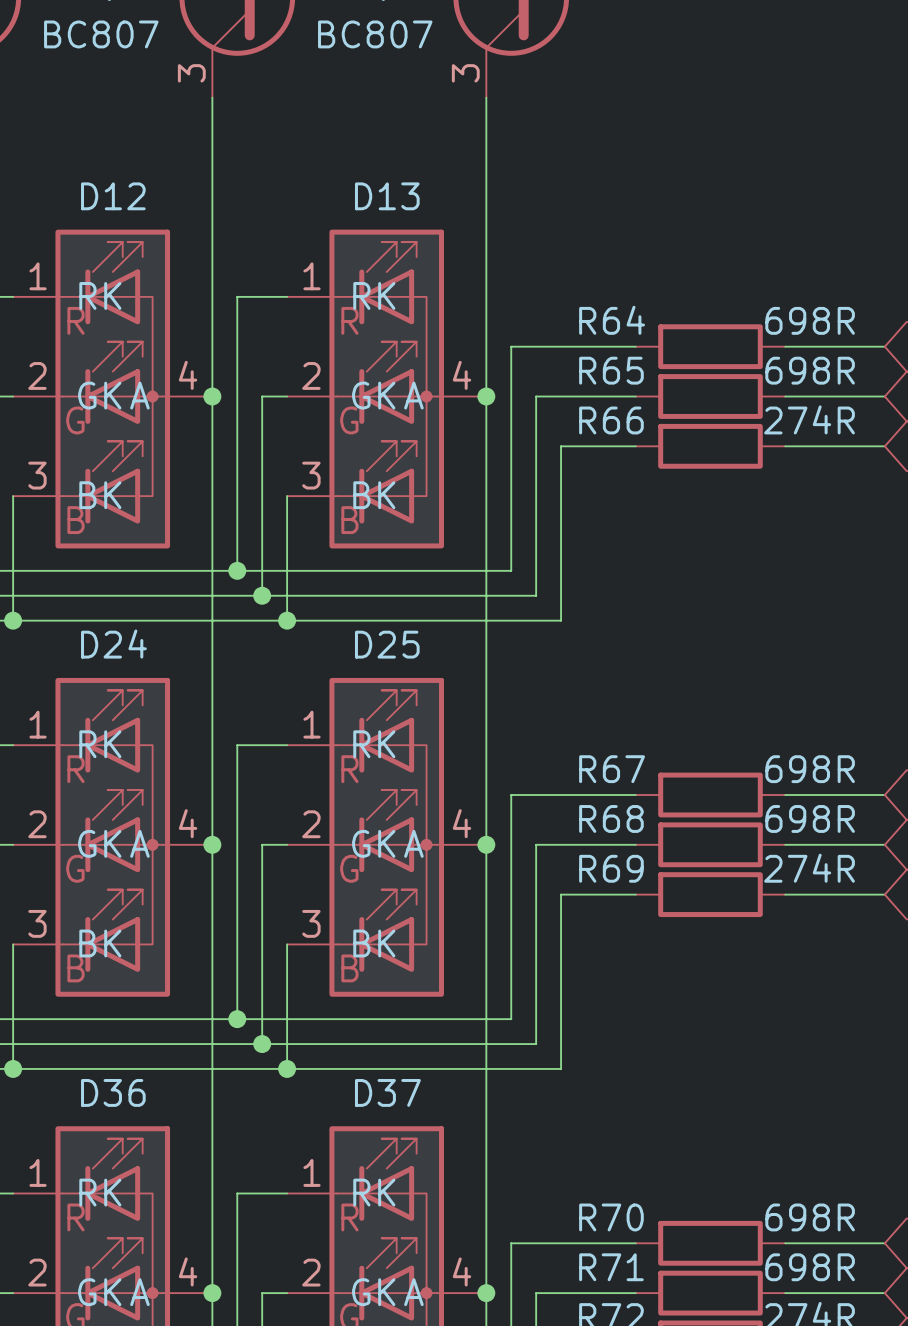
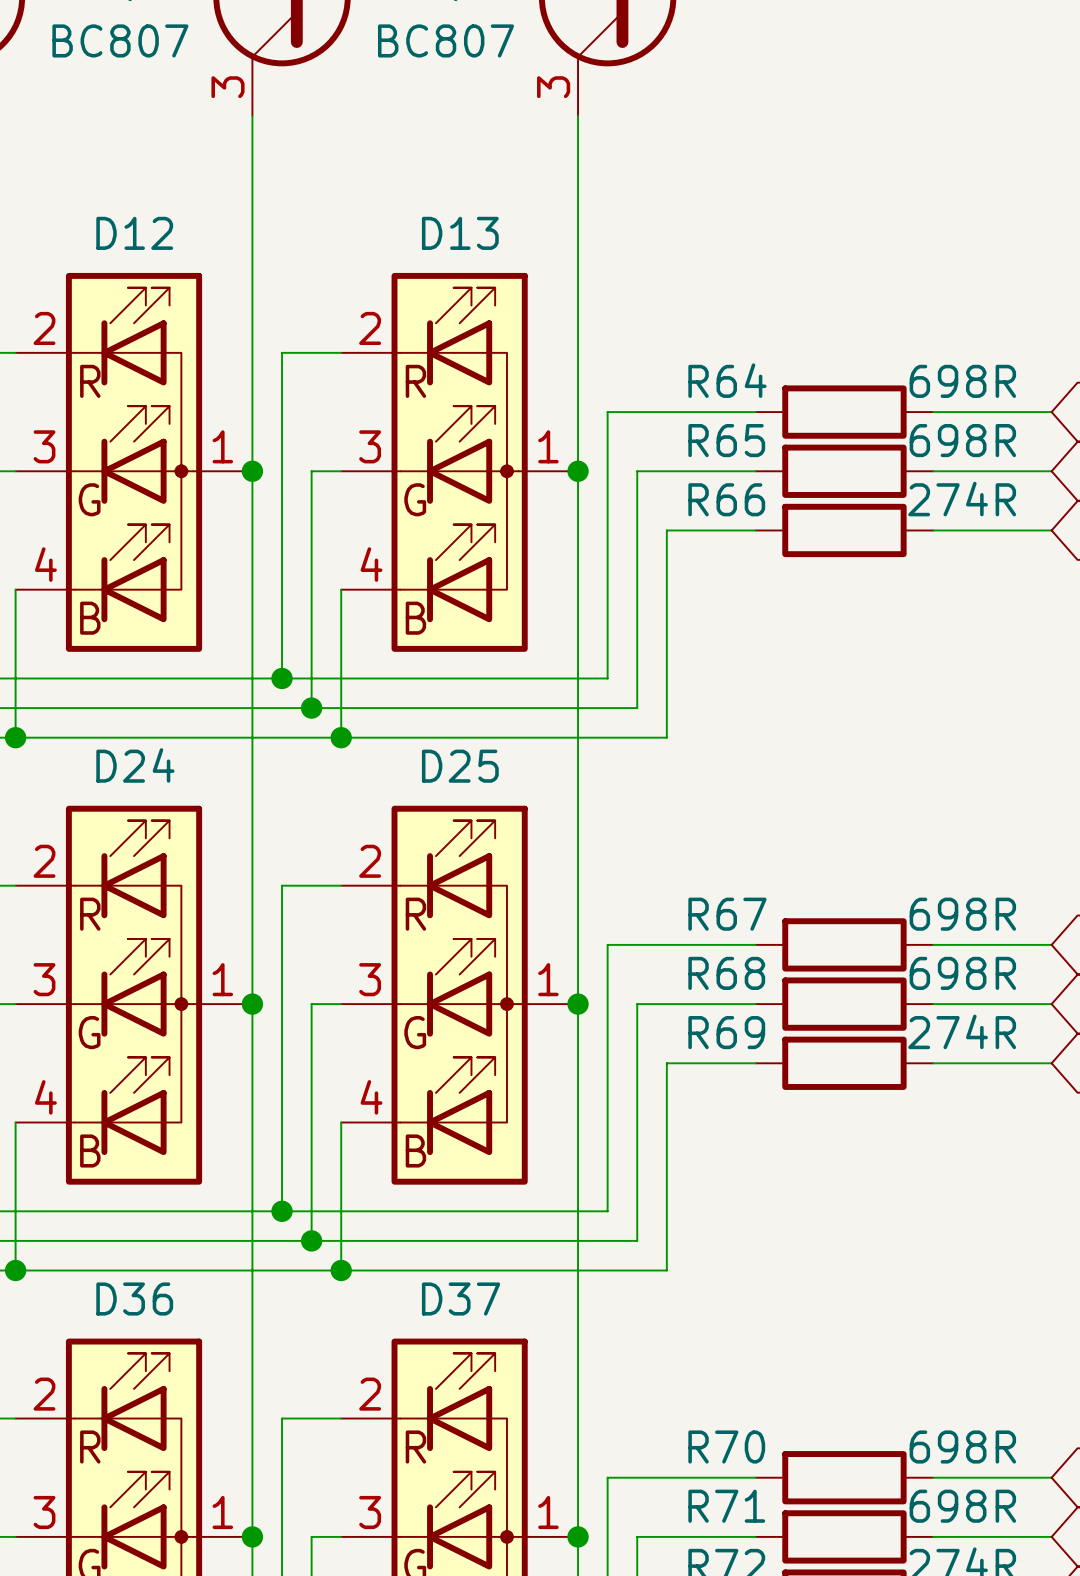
D12 pin number: 1 (38, 276) -> 2 (44, 328)
D13 pin number: 1 (311, 276) -> 2 (370, 328)
D12 pin name: RK (100, 295) -> none
D13 pin name: RK (374, 295) -> none
D12 pin number: 2 (37, 375) -> 3 (44, 446)
D12 pin number: 4 (188, 375) -> 1 (222, 446)
D13 pin number: 2 (311, 375) -> 3 (370, 446)
D13 pin number: 4 (462, 375) -> 1 (548, 446)
D12 pin name: GK (99, 395) -> none
D12 pin name: A (139, 395) -> none
D13 pin name: GK (373, 395) -> none
D13 pin name: A (413, 395) -> none
D12 pin number: 3 (37, 475) -> 4 (45, 564)
D13 pin number: 3 (311, 475) -> 4 (371, 564)
D12 pin name: BK (100, 495) -> none
D13 pin name: BK (374, 495) -> none
D24 pin number: 1 (38, 724) -> 2 (44, 861)
D25 pin number: 1 (311, 724) -> 2 (370, 861)
D24 pin name: RK (100, 744) -> none
D25 pin name: RK (374, 744) -> none
D24 pin number: 4 (188, 823) -> 1 (222, 979)
D25 pin number: 4 (462, 823) -> 1 (548, 979)
D24 pin number: 2 (37, 824) -> 3 (44, 979)
D25 pin number: 2 (311, 824) -> 3 (370, 979)
D24 pin name: GK (99, 843) -> none
D24 pin name: A (139, 843) -> none
D25 pin name: GK (373, 843) -> none
D25 pin name: A (413, 843) -> none
D24 pin number: 3 (37, 923) -> 4 (45, 1097)
D25 pin number: 3 (311, 923) -> 4 (371, 1097)
D24 pin name: BK (100, 943) -> none
D25 pin name: BK (374, 943) -> none
D36 pin number: 1 (38, 1172) -> 2 (44, 1394)
D37 pin number: 1 (311, 1172) -> 2 (370, 1394)
D36 pin name: RK (100, 1192) -> none
D37 pin name: RK (374, 1192) -> none
D36 pin number: 4 (188, 1271) -> 1 (222, 1512)
D37 pin number: 4 (462, 1271) -> 1 (548, 1512)
D36 pin number: 2 (37, 1272) -> 3 (44, 1512)
D37 pin number: 2 (311, 1272) -> 3 (370, 1512)
D36 pin name: GK (99, 1292) -> none
D36 pin name: A (139, 1292) -> none
D37 pin name: GK (373, 1292) -> none
D37 pin name: A (413, 1292) -> none

